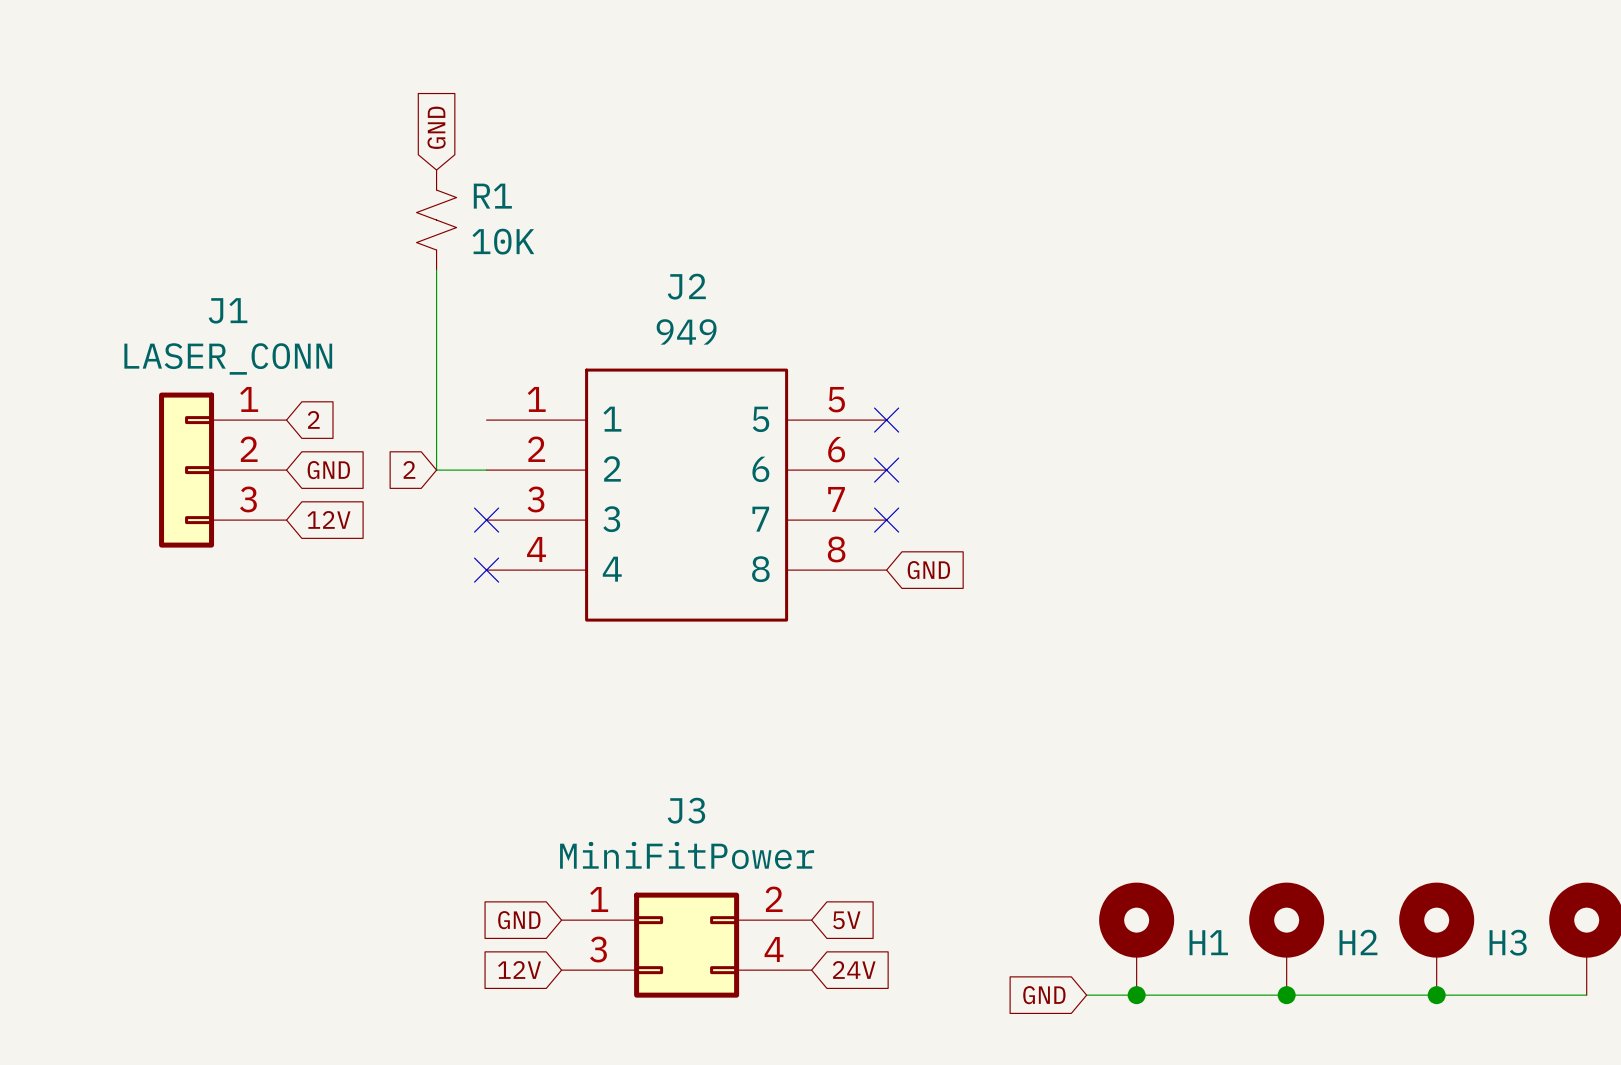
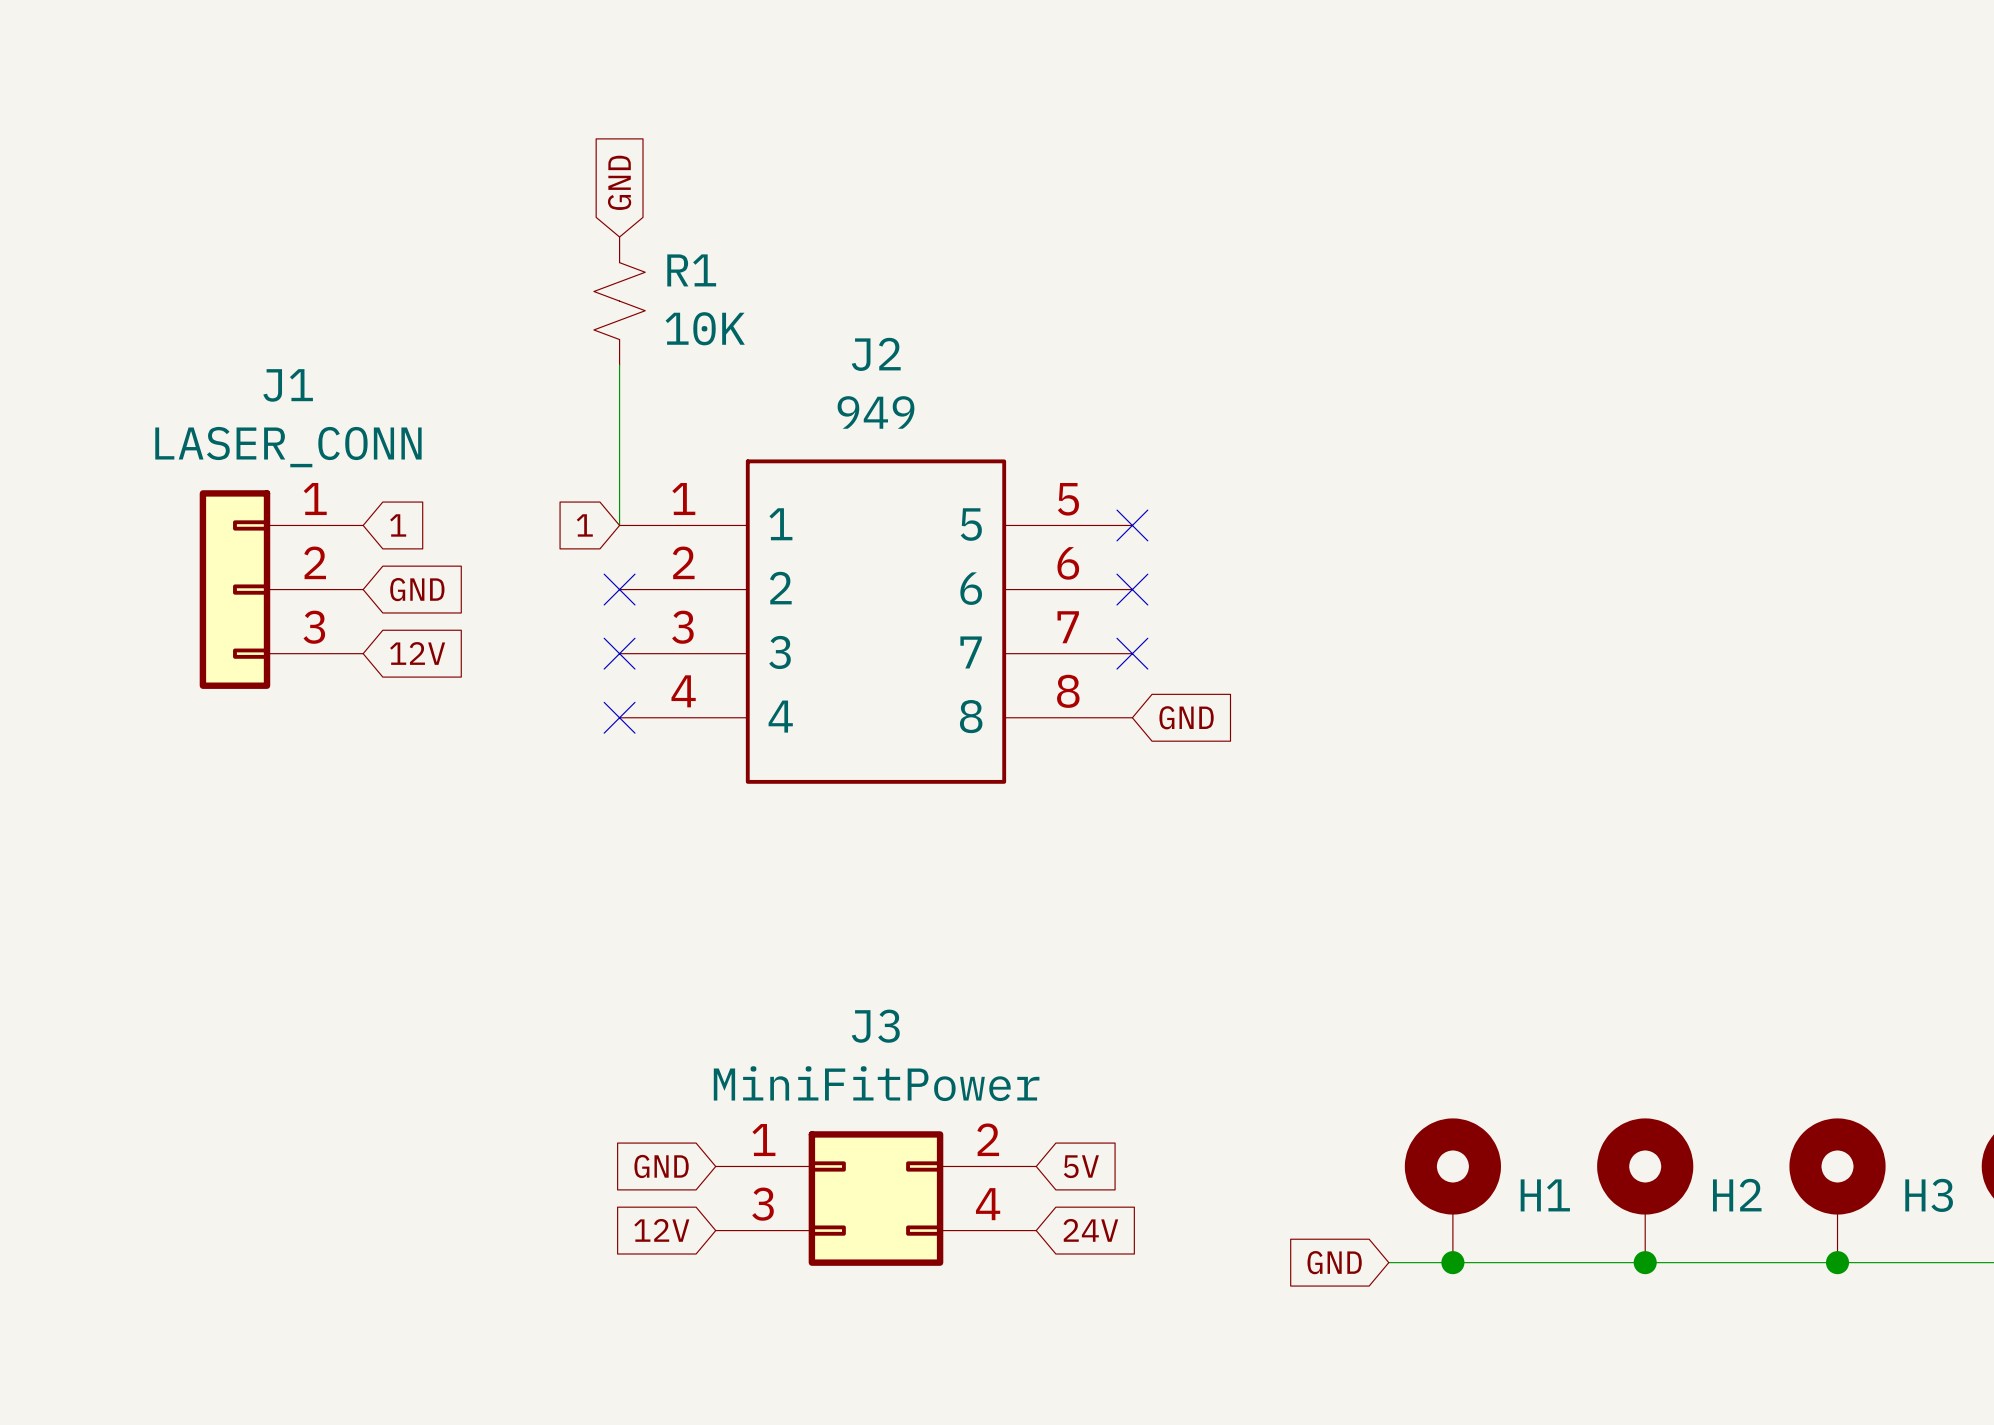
global label position: GND (436, 127) -> GND (619, 182)
R1 position: (436, 220) -> (619, 301)
wire: (436, 270) (436, 470) (486, 470) -> none
wire: none -> (619, 365) (619, 525)
global label: 2 (313, 419) -> 1 (398, 525)
global label: none -> 1 (584, 525)
global label: 2 (409, 469) -> none
no-connect mark: none -> (619, 589)

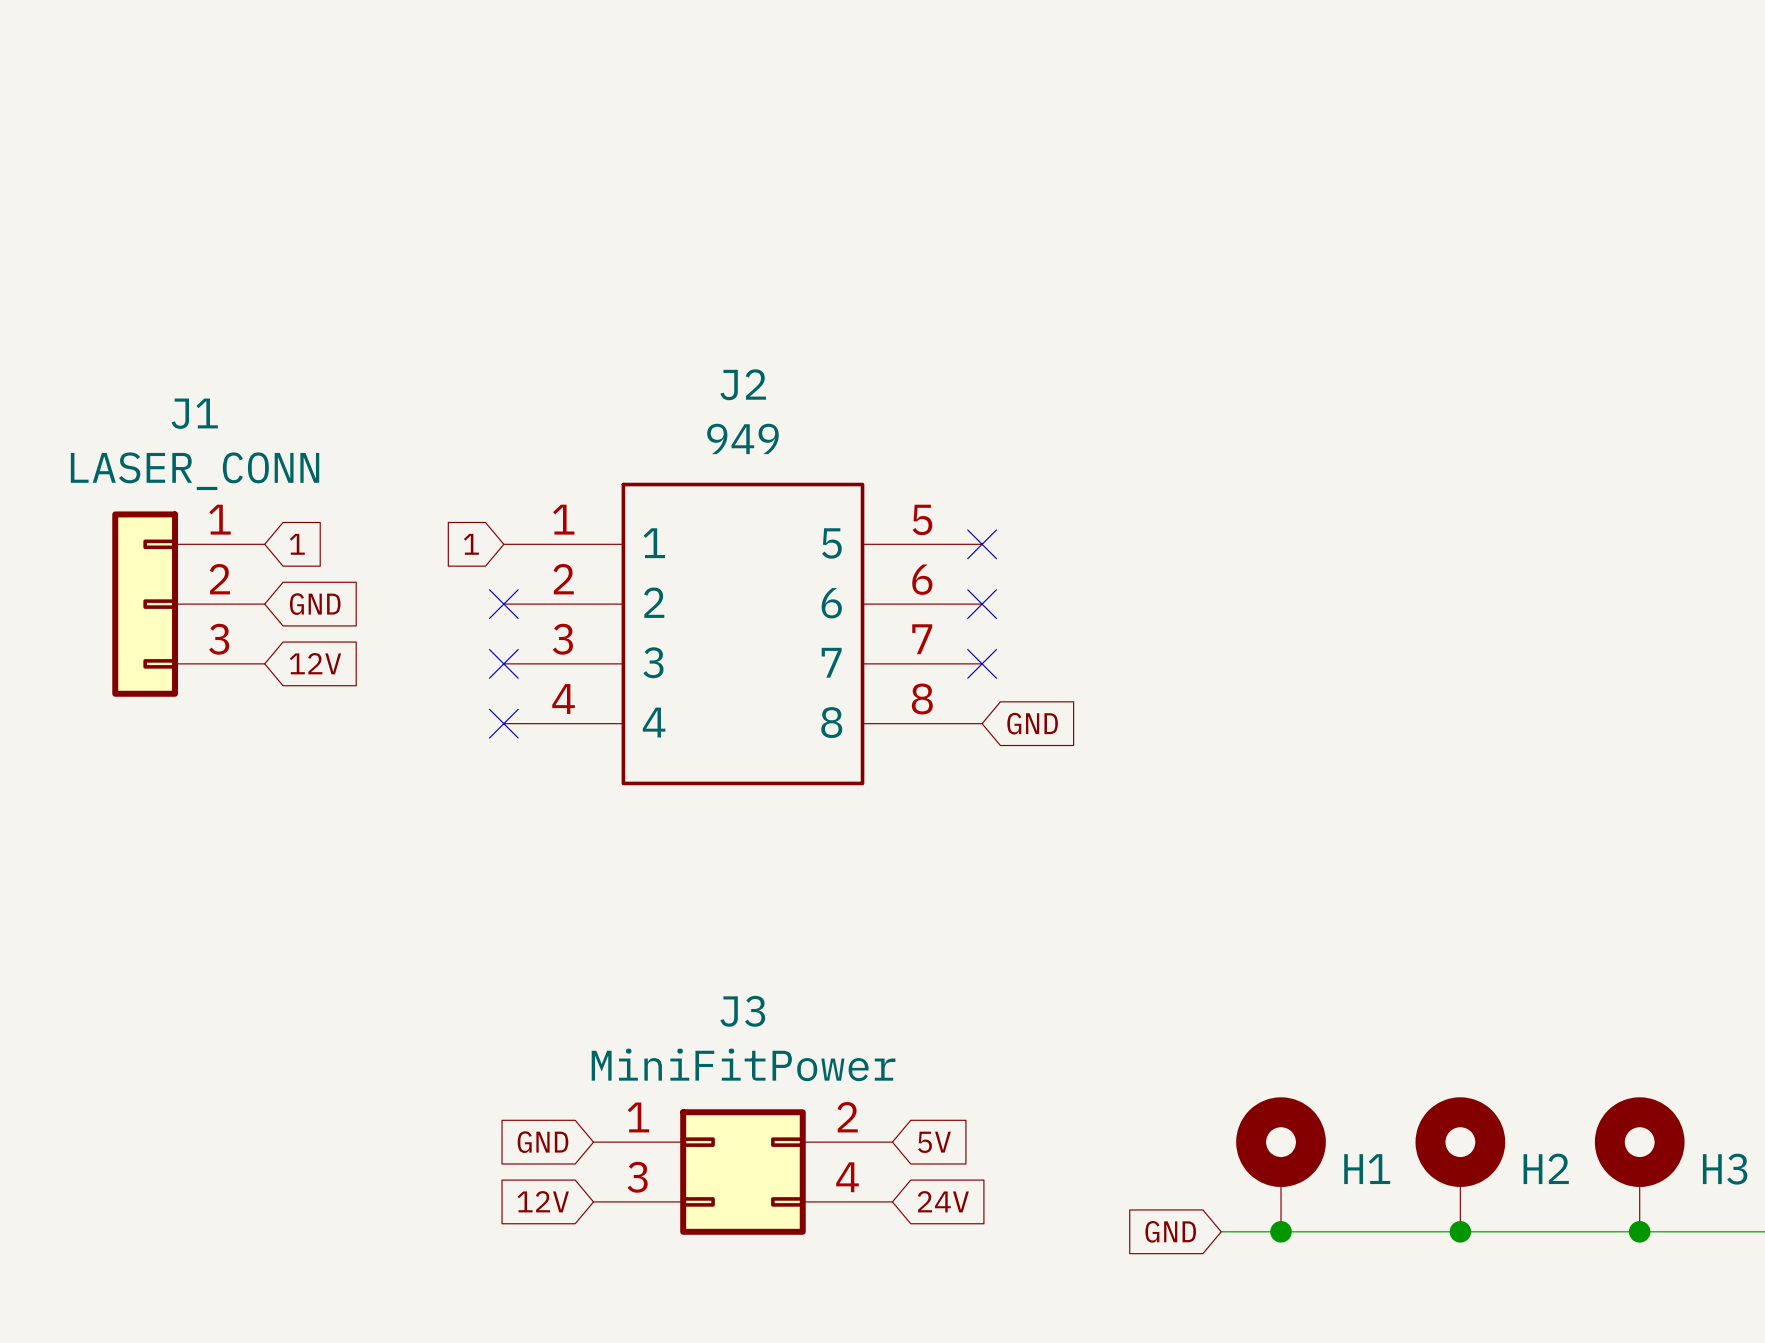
global label: GND (619, 182) -> none
R1: 10K (619, 301) -> none
wire: (619, 365) (619, 525) -> none

